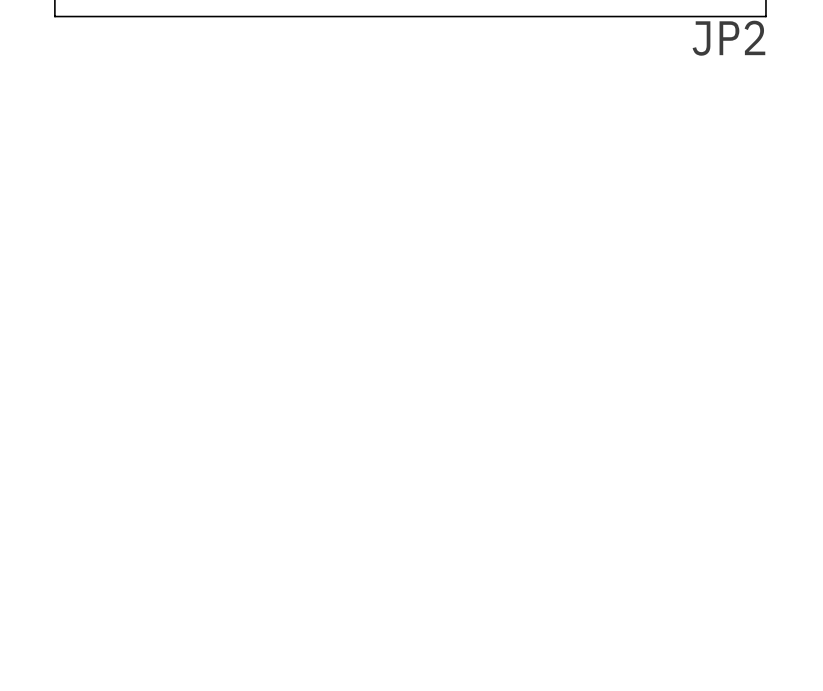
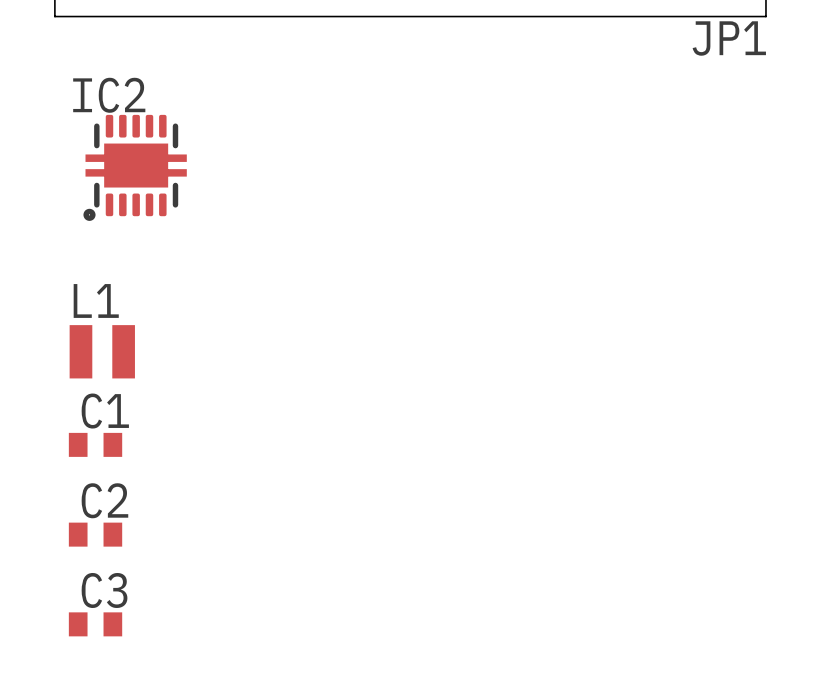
JP2 name: JP2 (728, 38) -> JP1 (729, 38)
IC2: none -> (135, 167)
L1: none -> (102, 351)
C1: none -> (95, 444)
C2: none -> (95, 534)
C3: none -> (95, 624)

